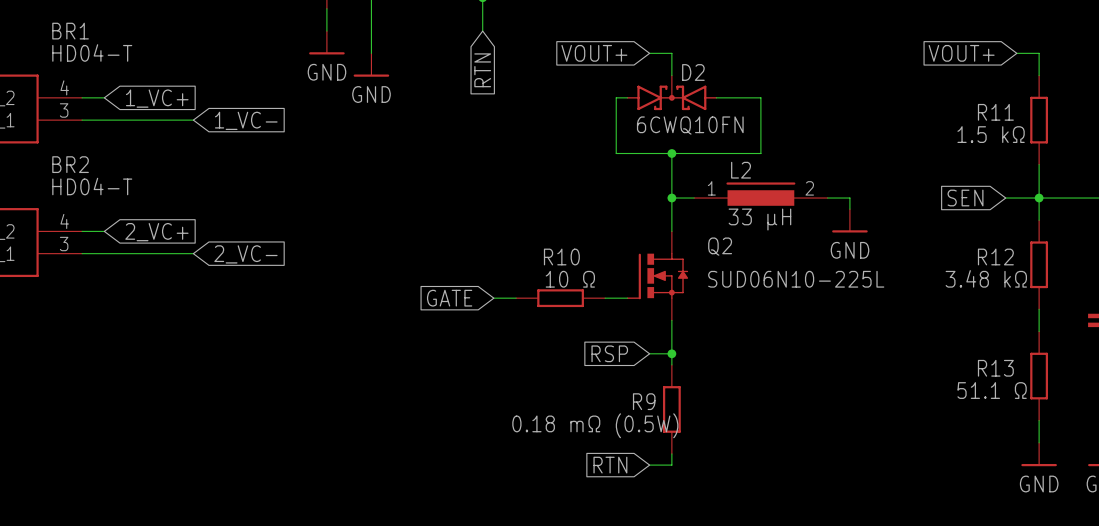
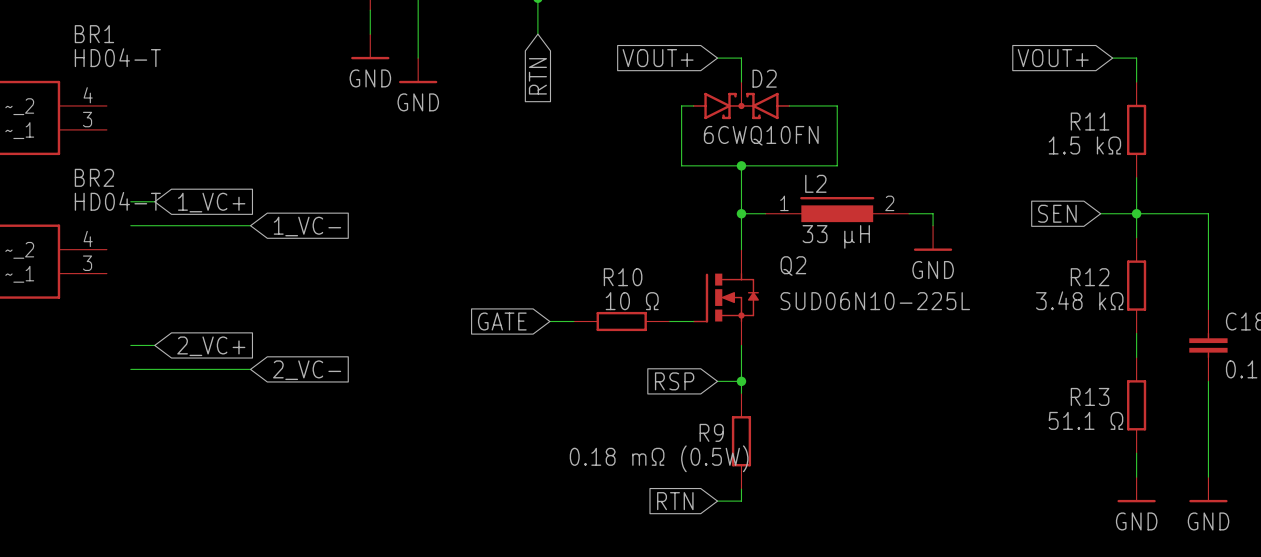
wire: (82, 97) (104, 97) -> (130, 201) (154, 201)
global label position: 1_VC+ (157, 98) -> 1_VC+ (211, 202)
wire: (82, 120) (193, 120) -> (130, 225) (250, 225)
global label position: 1_VC- (246, 120) -> 1_VC- (307, 226)
wire: (82, 231) (104, 231) -> (130, 345) (154, 345)
global label position: 2_VC+ (156, 232) -> 2_VC+ (211, 346)
wire: (82, 253) (193, 253) -> (130, 369) (250, 369)
global label position: 2_VC- (245, 254) -> 2_VC- (307, 370)

